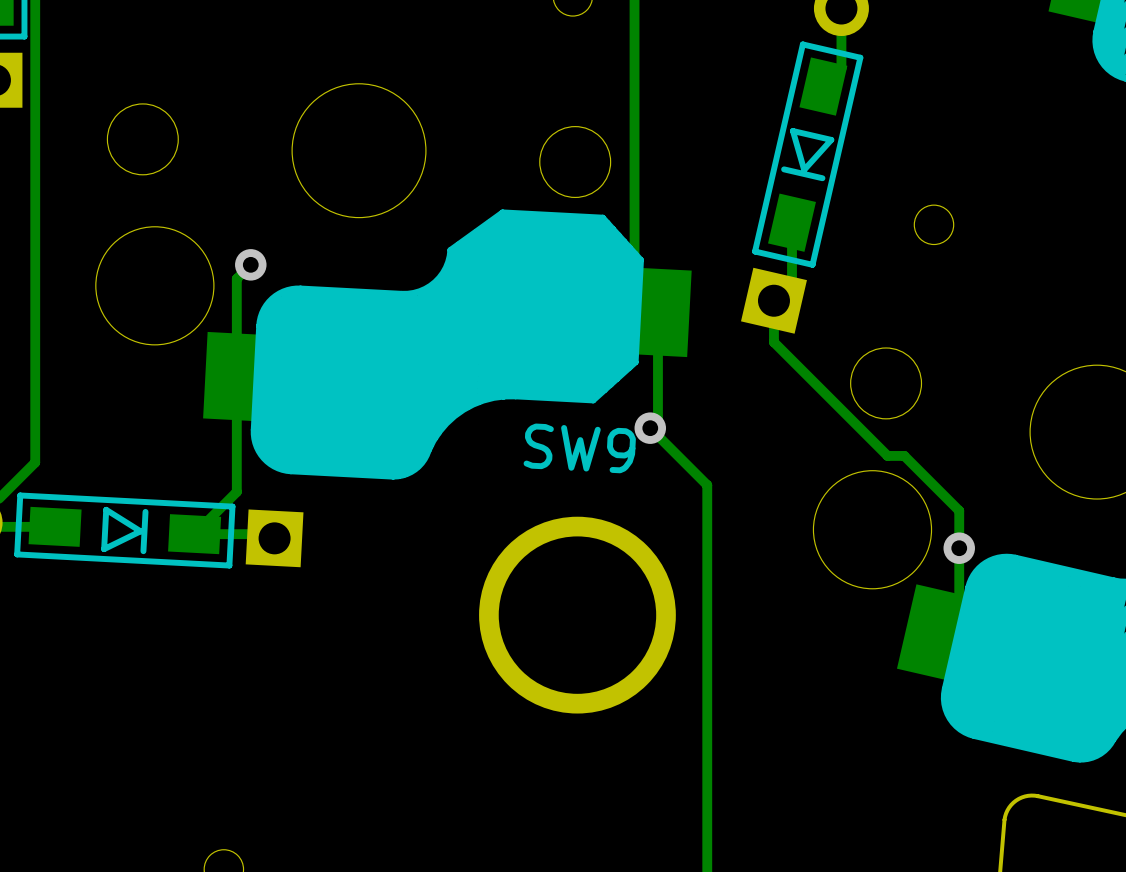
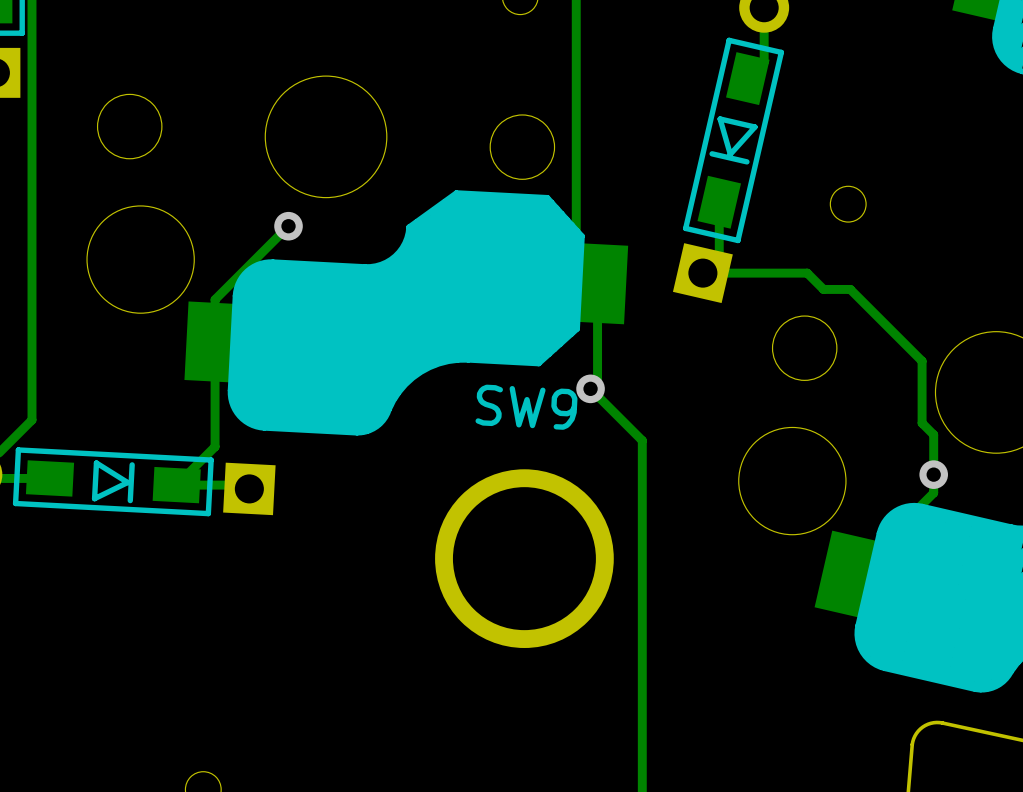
track: (250, 264) (236, 278) (236, 329) -> (288, 226) (215, 299)
via position: (250, 264) -> (288, 226)
track: (773, 300) (773, 342) (887, 455) (904, 455) (959, 510) (959, 611) -> (702, 273) (807, 273) (823, 289) (850, 289) (922, 361) (922, 423) (933, 434) (933, 492) (871, 555)
via position: (959, 548) -> (933, 474)

